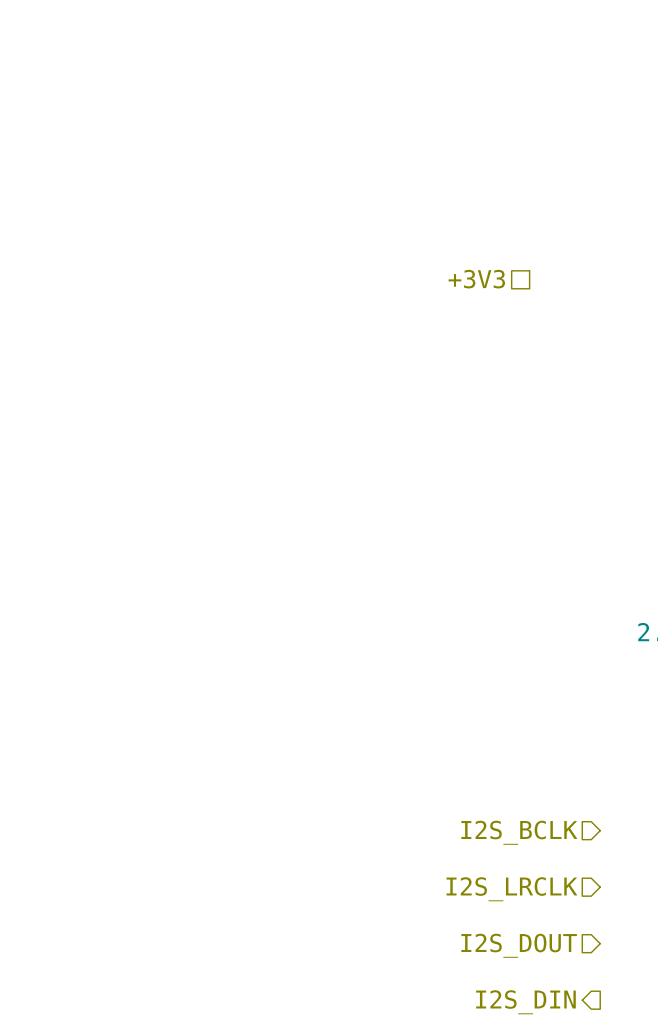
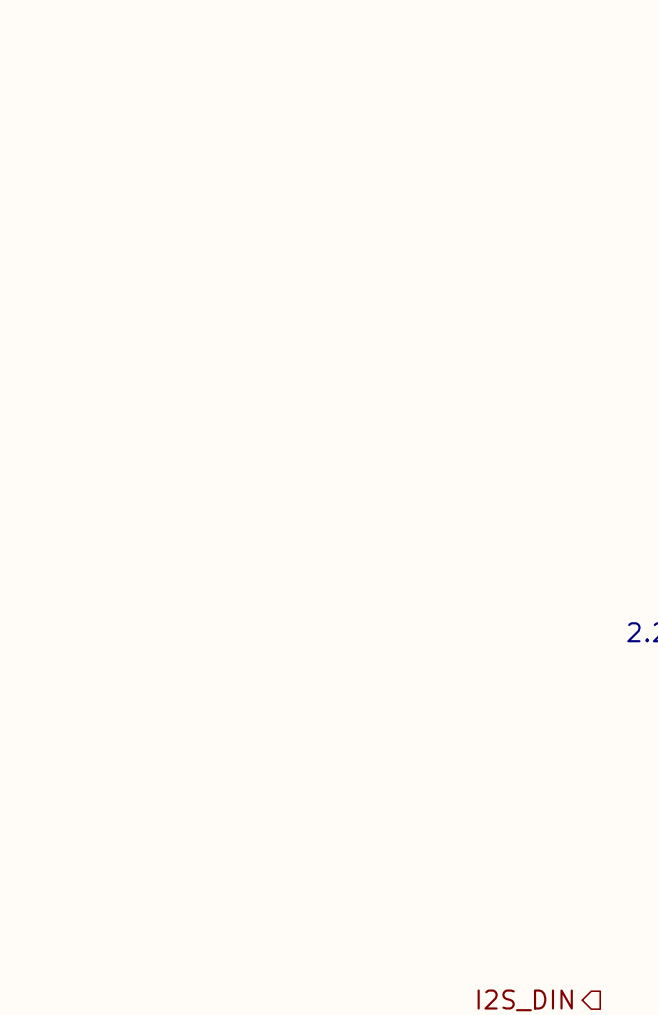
hierarchical label: +3V3 (476, 279) -> none
hierarchical label: I2S_BCLK (519, 832) -> none
hierarchical label: I2S_LRCLK (511, 889) -> none
hierarchical label: I2S_DOUT (519, 945) -> none

